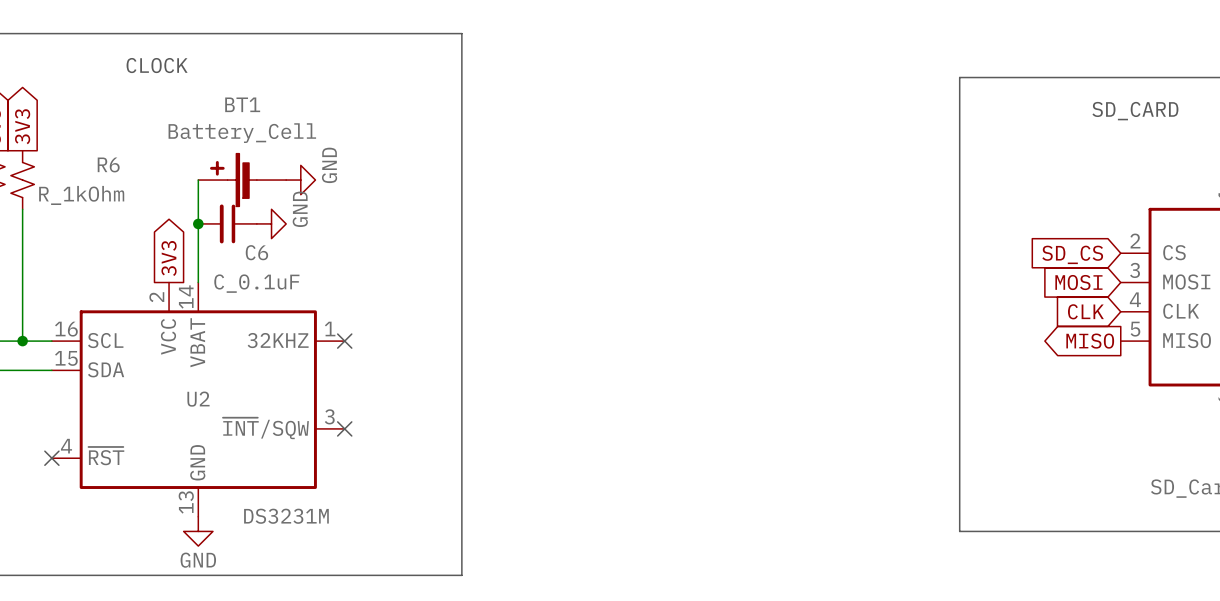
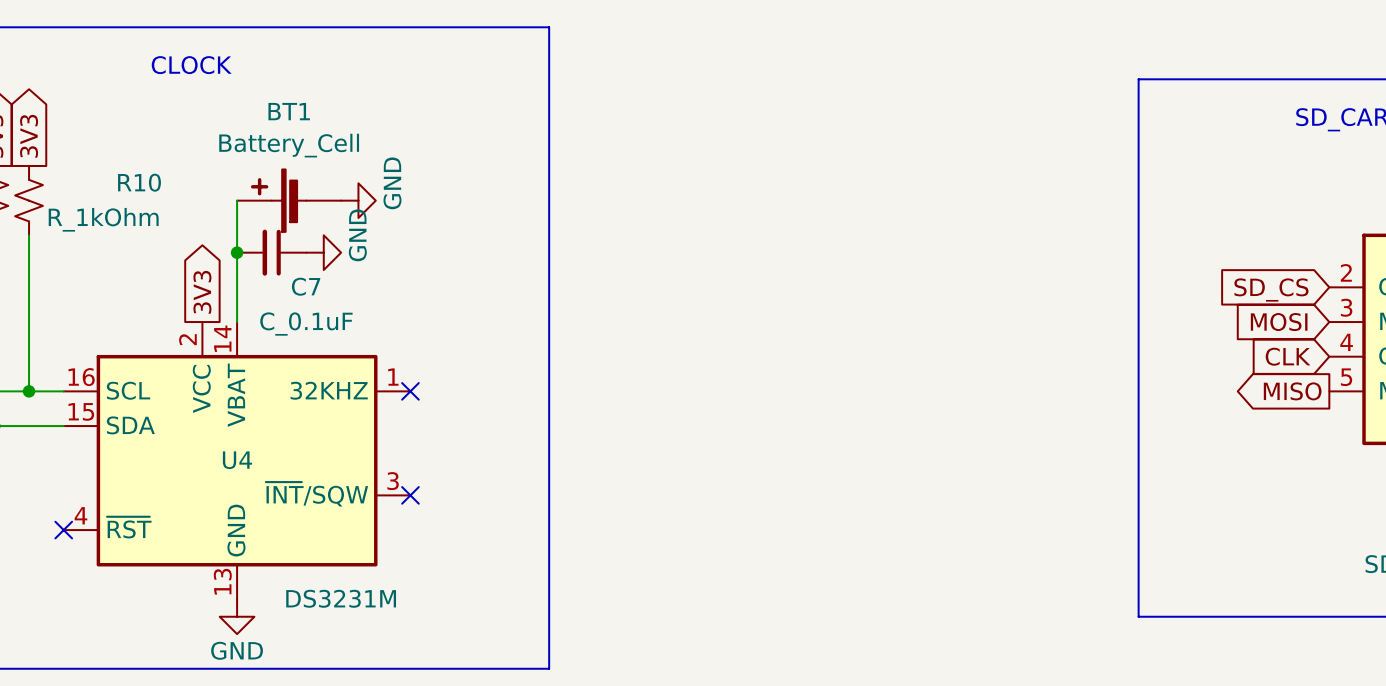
R6 name: R6 (108, 164) -> R10 (139, 182)
C6 name: C6 (256, 252) -> C7 (306, 286)
U2 name: U2 (198, 399) -> U4 (237, 460)

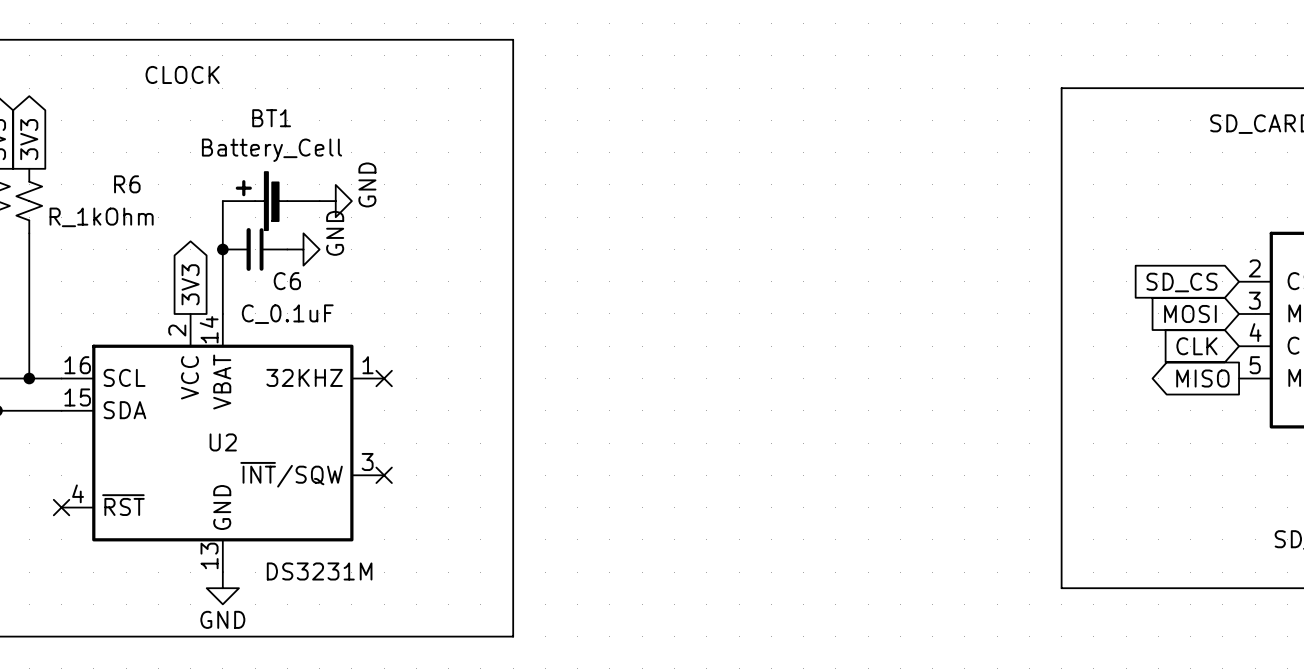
R10 name: R10 (139, 182) -> R6 (127, 184)
C7 name: C7 (306, 286) -> C6 (287, 281)
U4 name: U4 (237, 460) -> U2 (223, 442)

